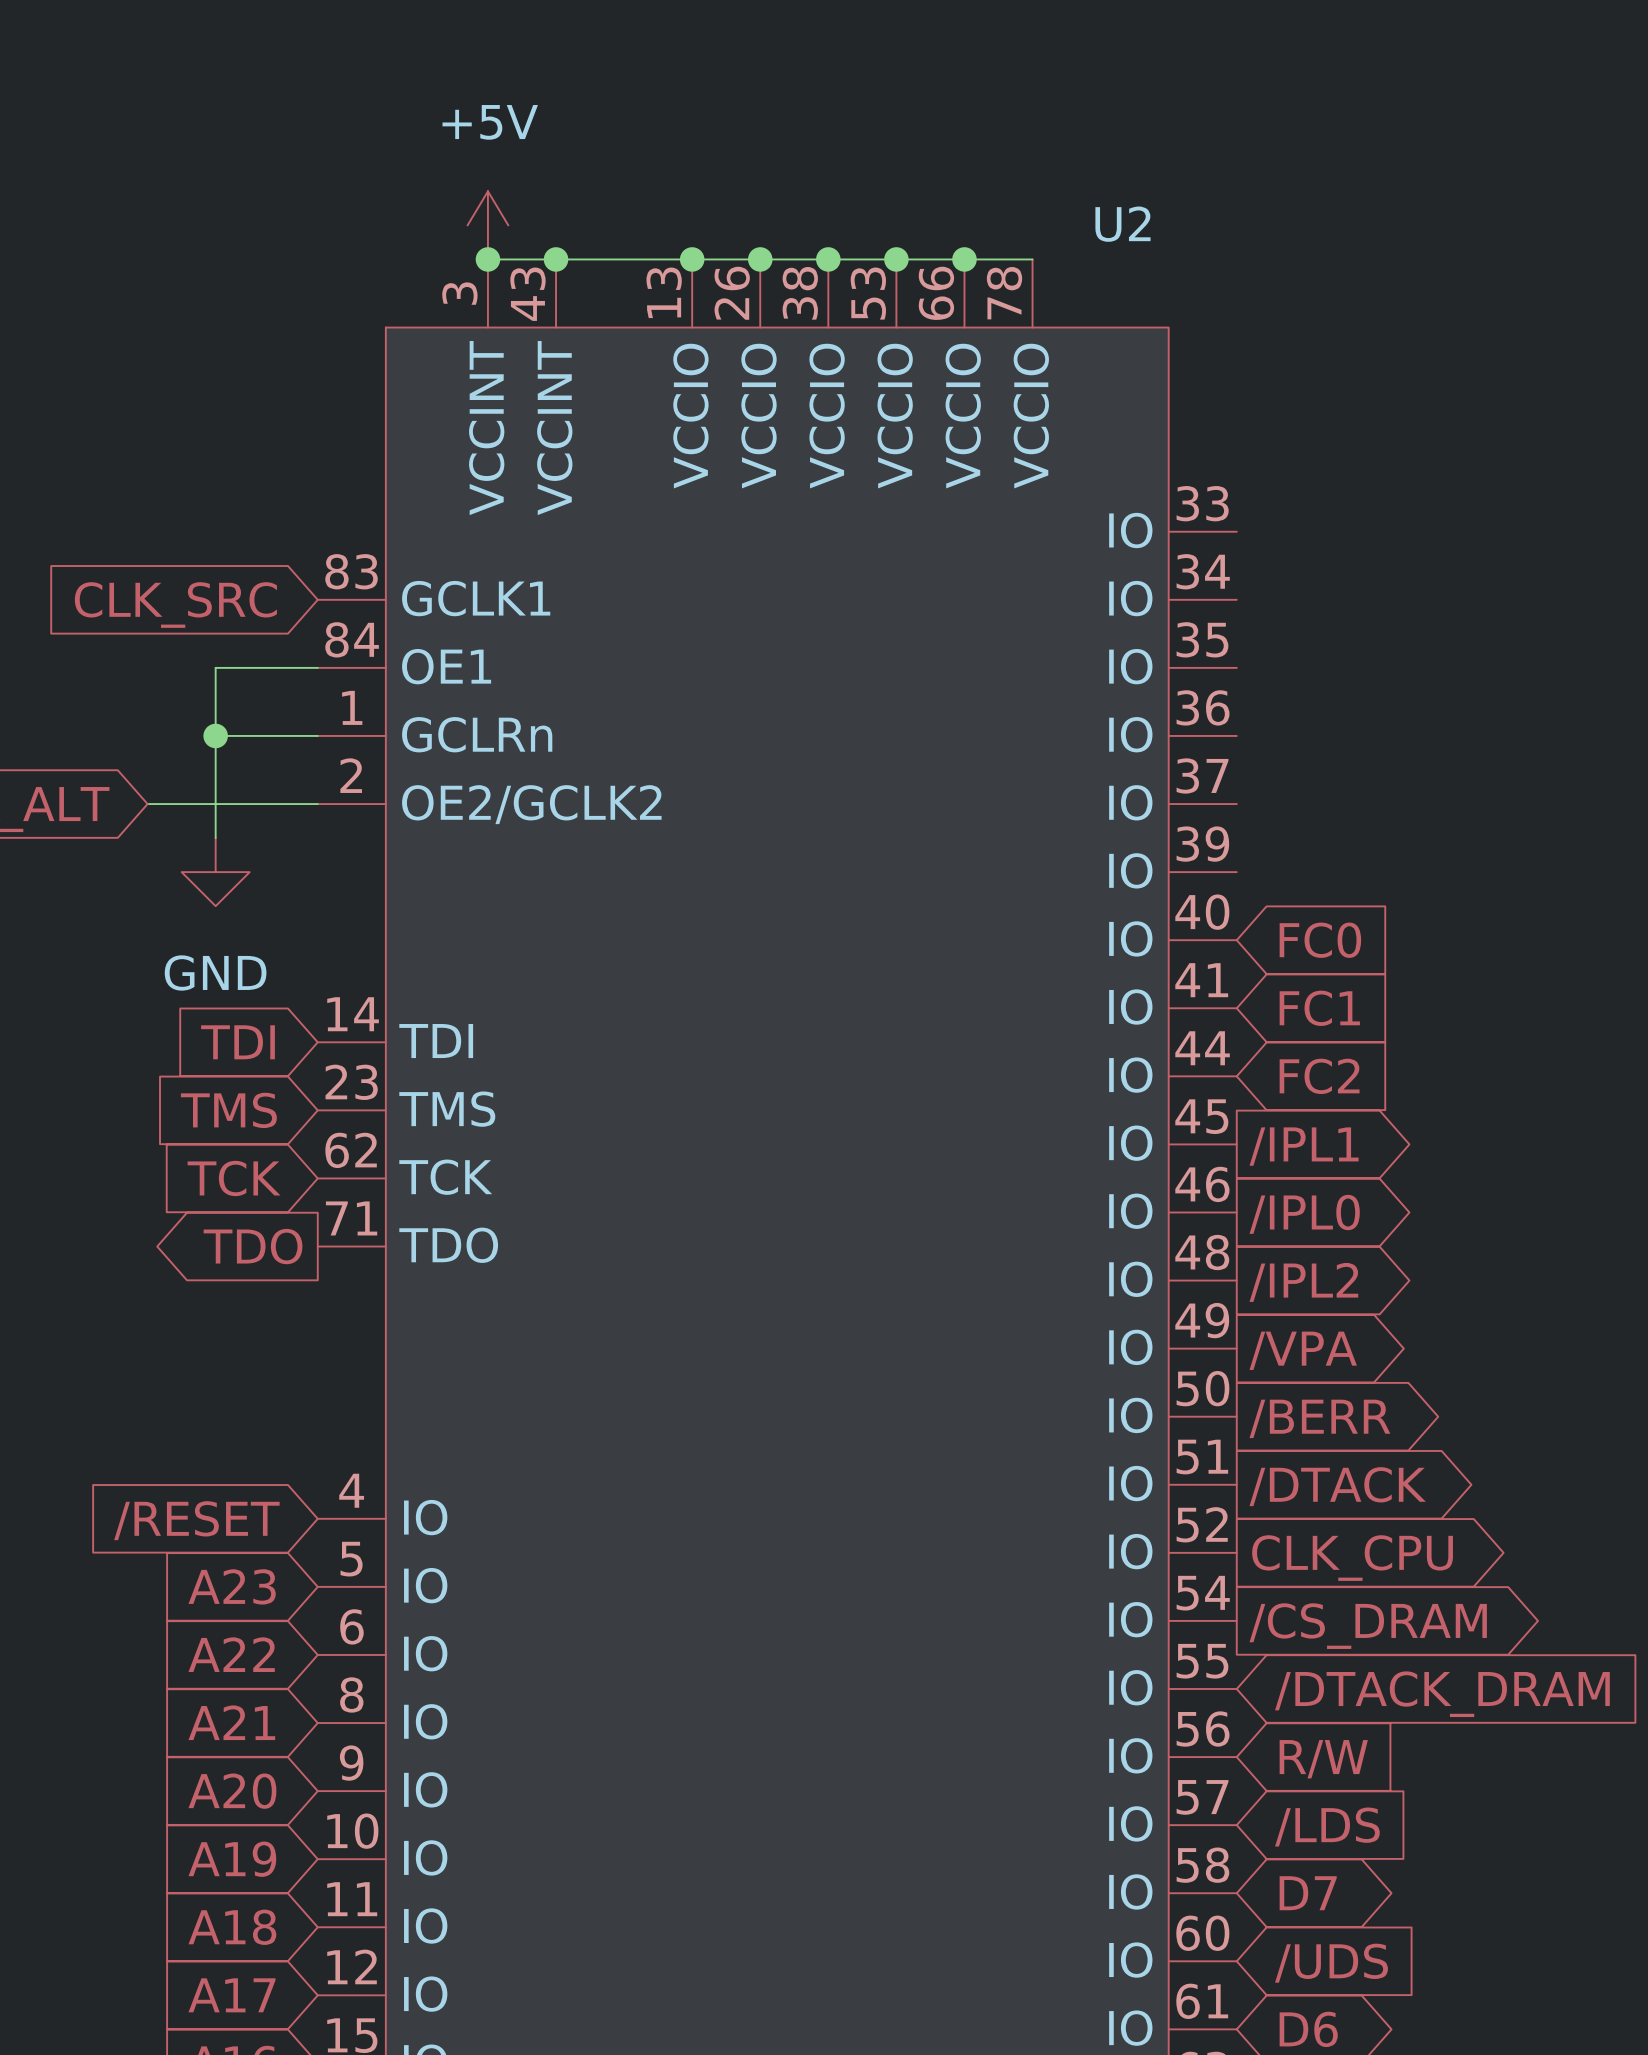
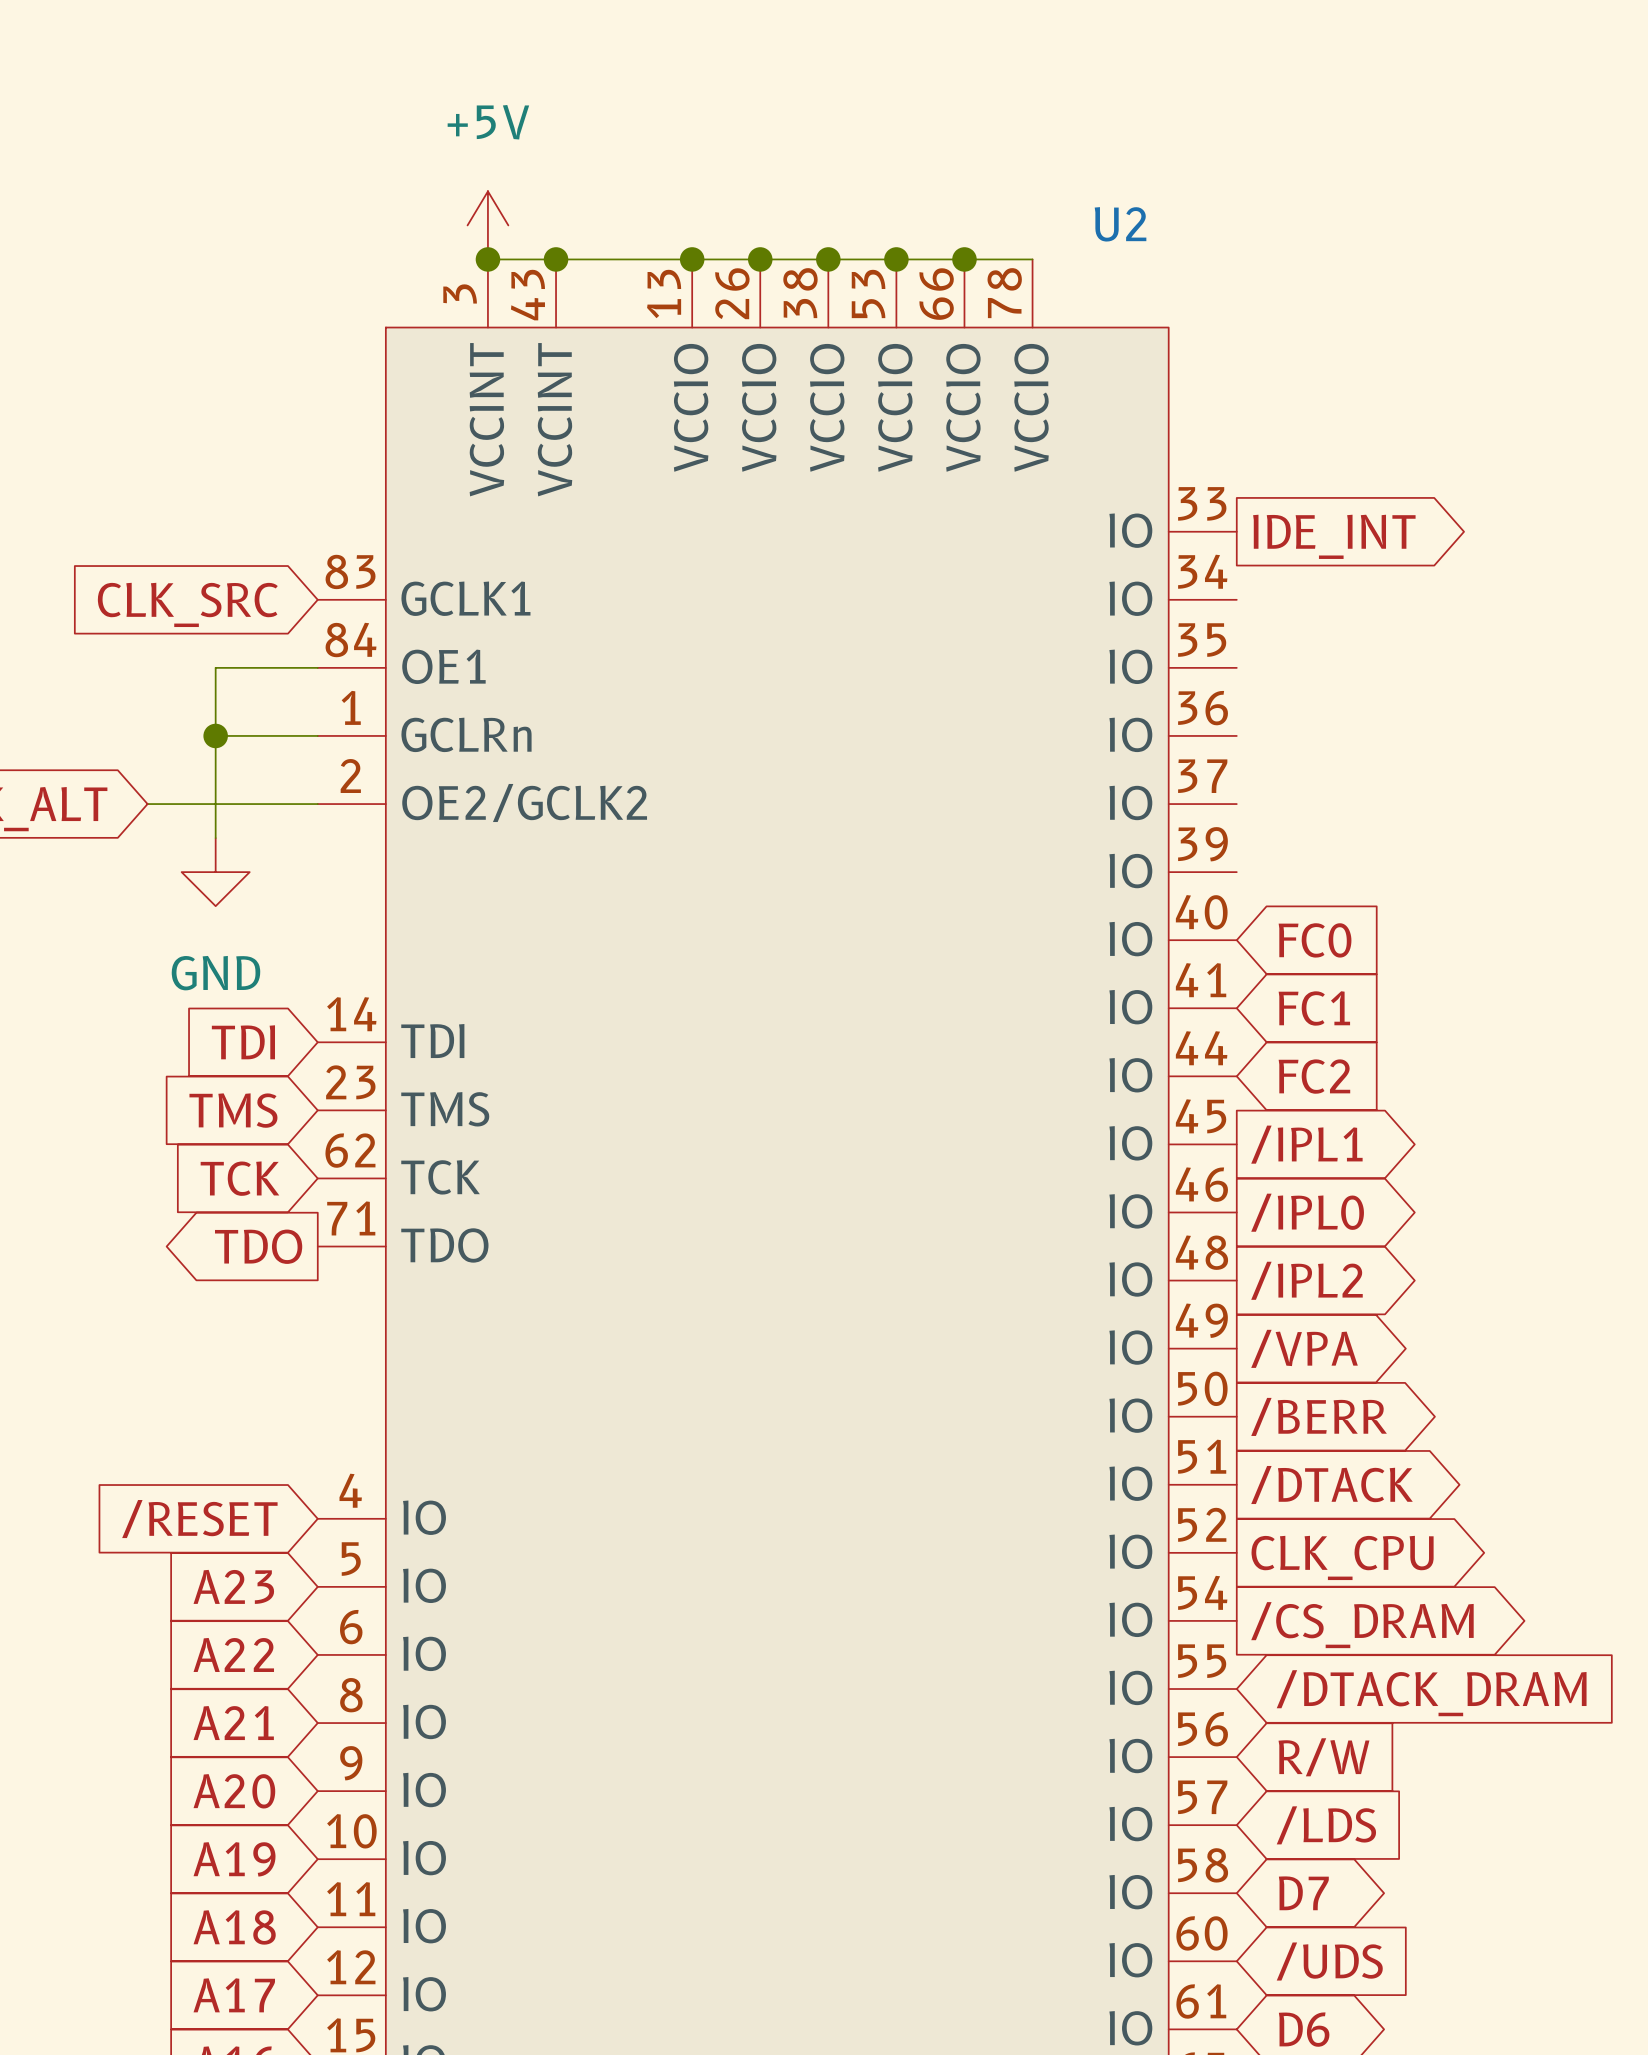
global label: none -> IDE_INT (1334, 536)

